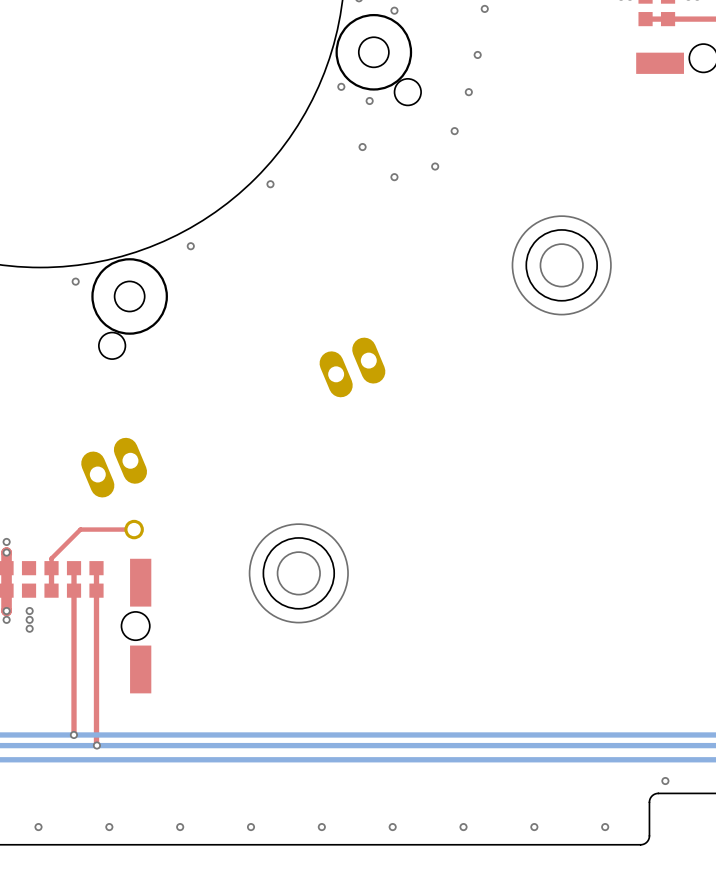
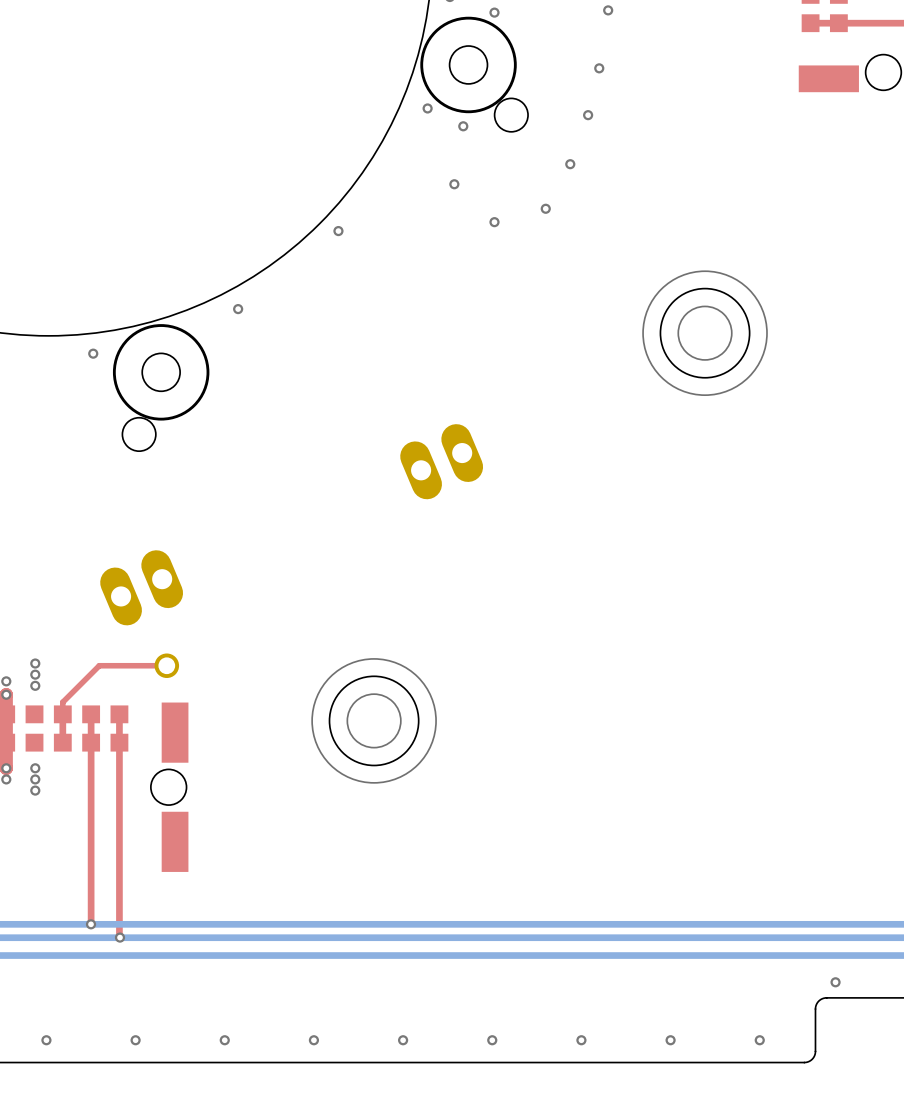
via: none -> (35, 663)
via: none -> (35, 674)
via: none -> (35, 685)

